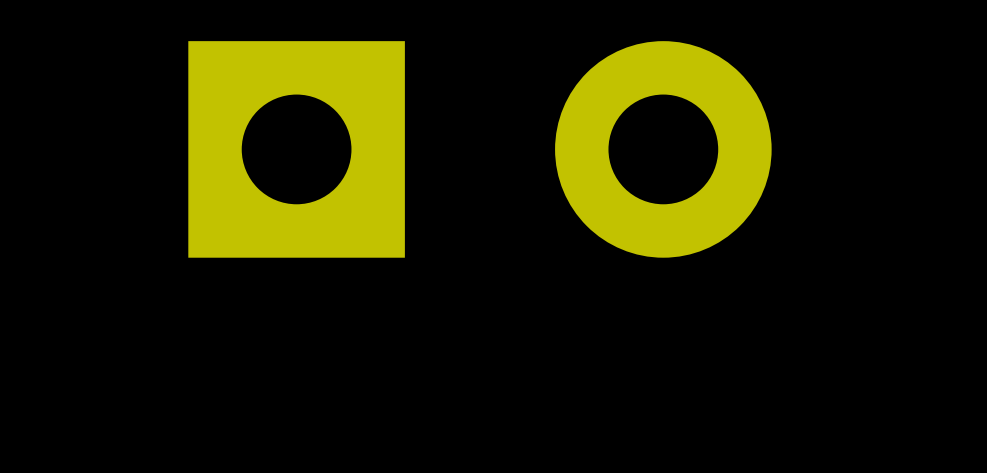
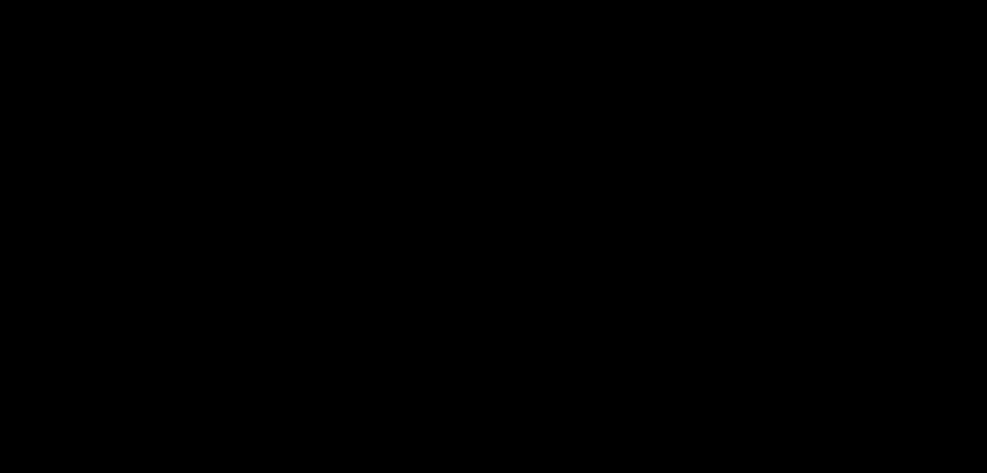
part: (479, 149) -> none

